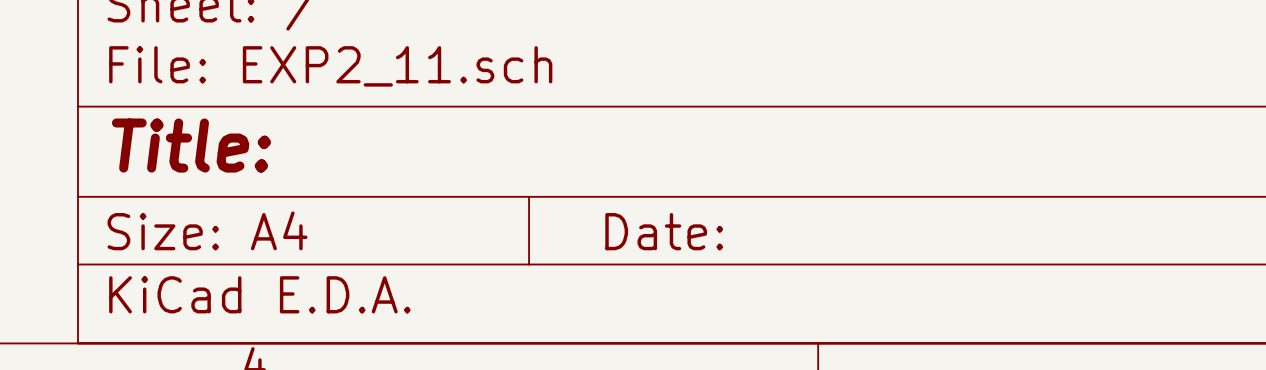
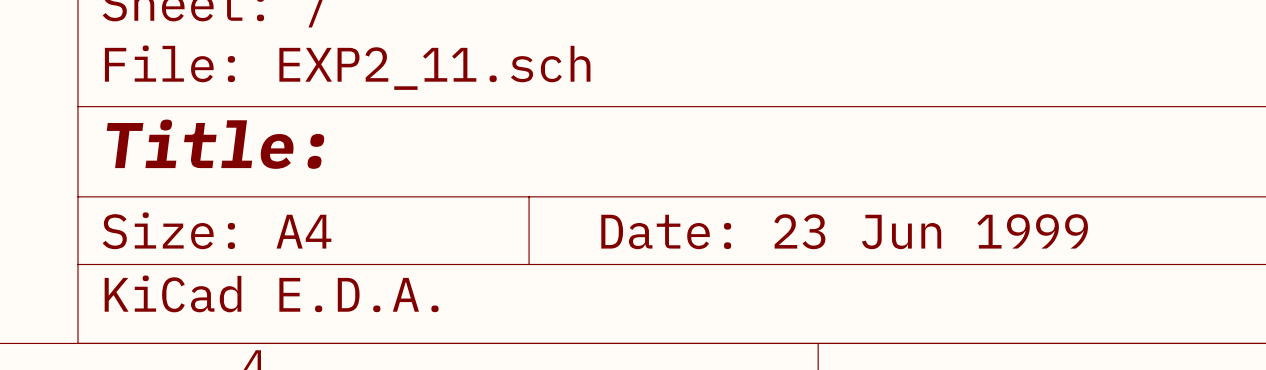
title block: Date: (664, 231) -> Date: 23 Jun 1999 (844, 231)

